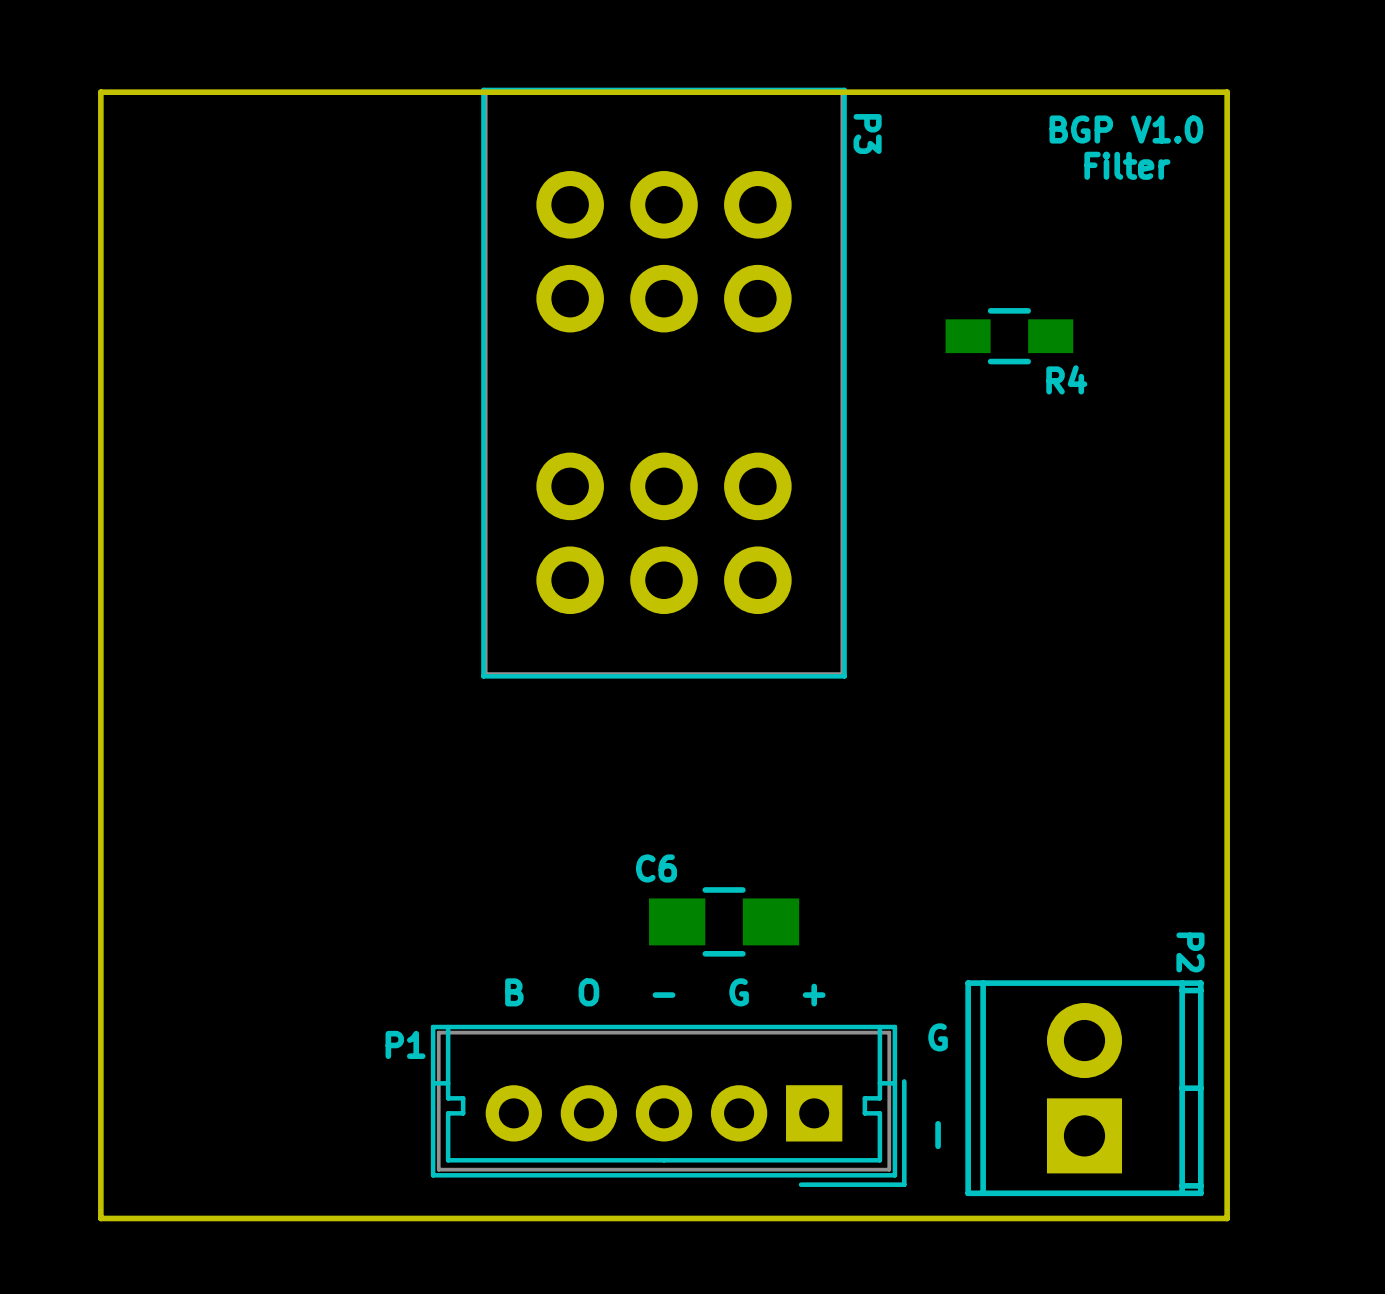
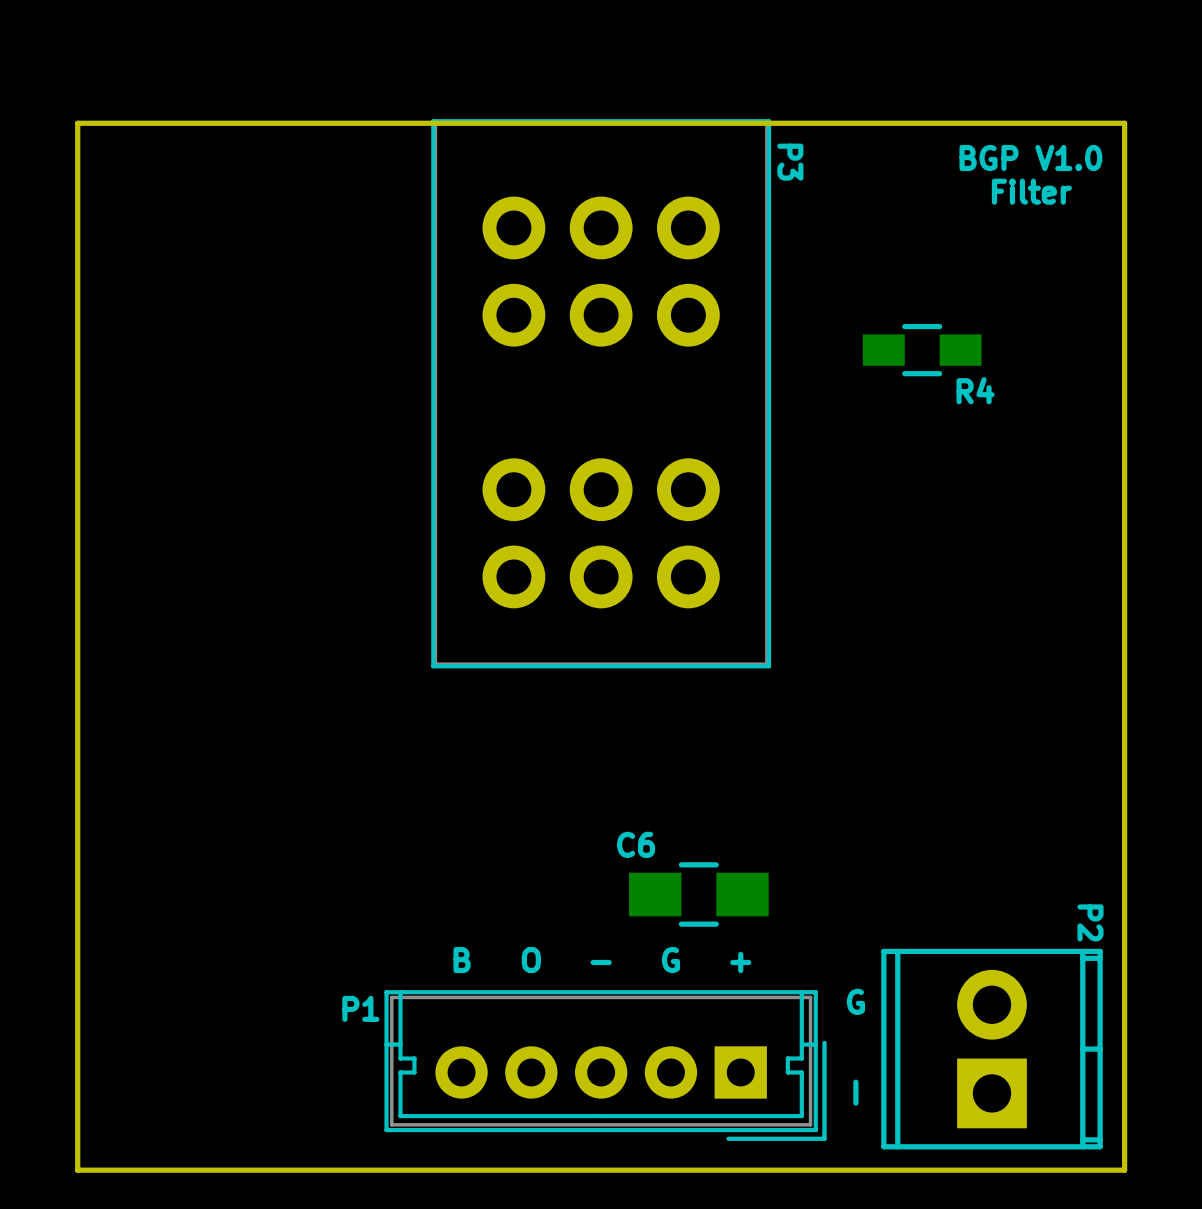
C6 position: (724, 921) -> (698, 894)

